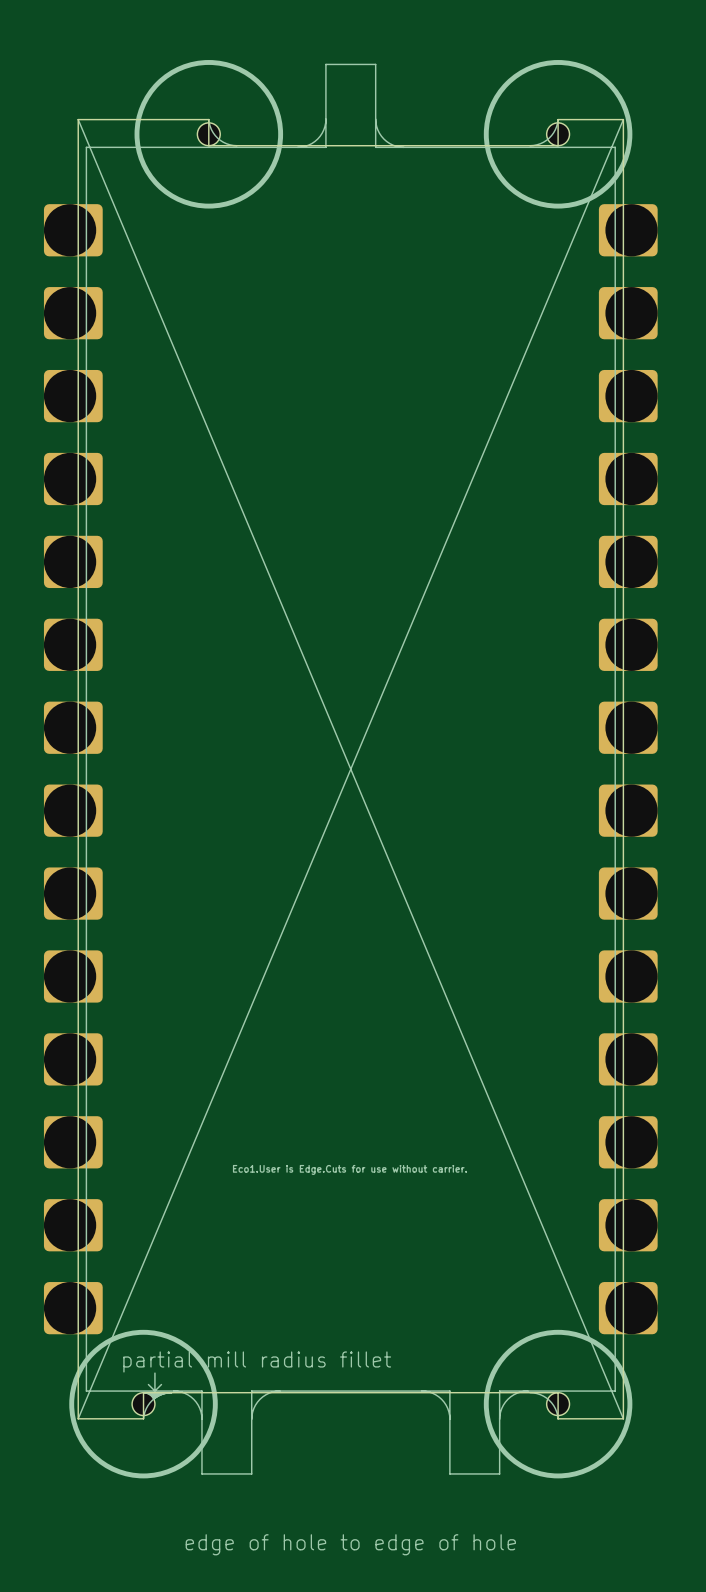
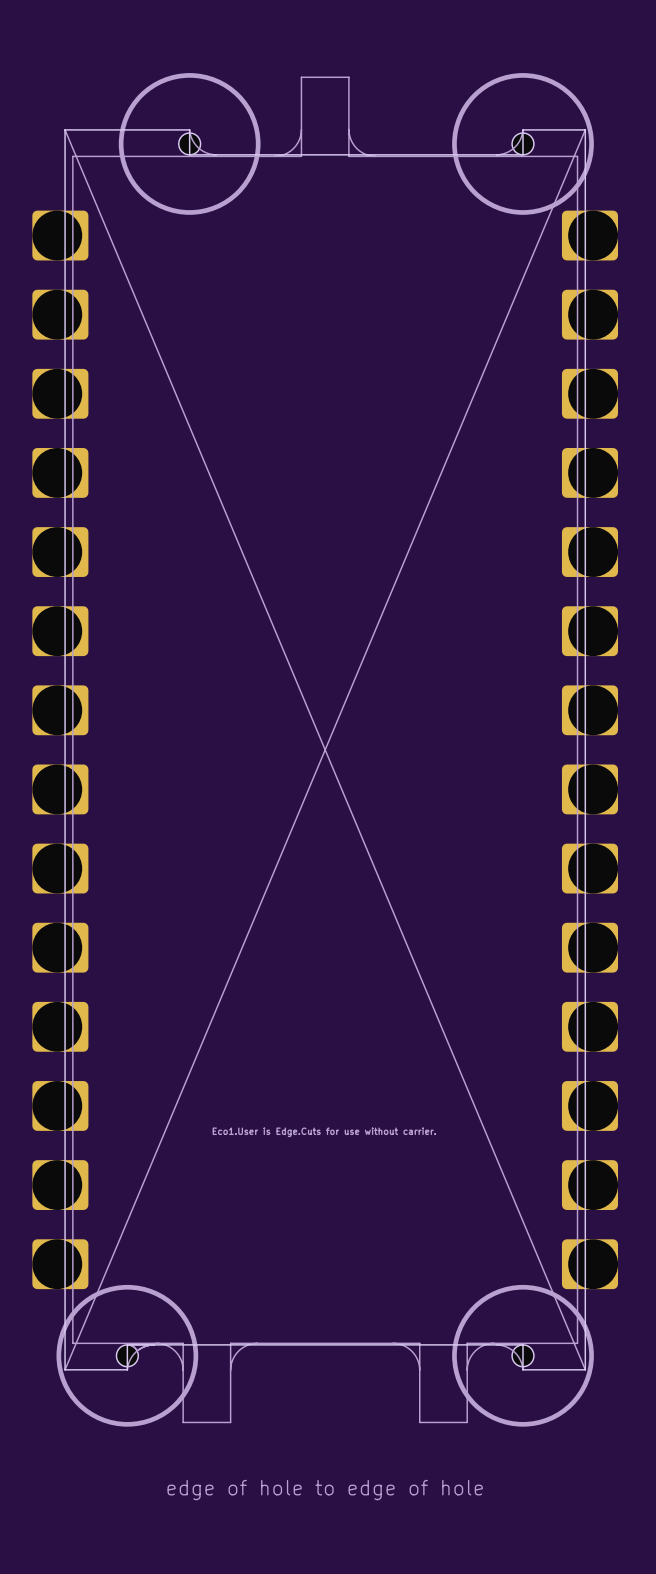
text: partial mill radius fillet (257, 1361) -> none
line: (154, 1373) (154, 1391) -> none
line: (148, 1384) (154, 1391) -> none
line: (161, 1384) (154, 1391) -> none
drawing: [143, 1392, 172, 1400] -> none

